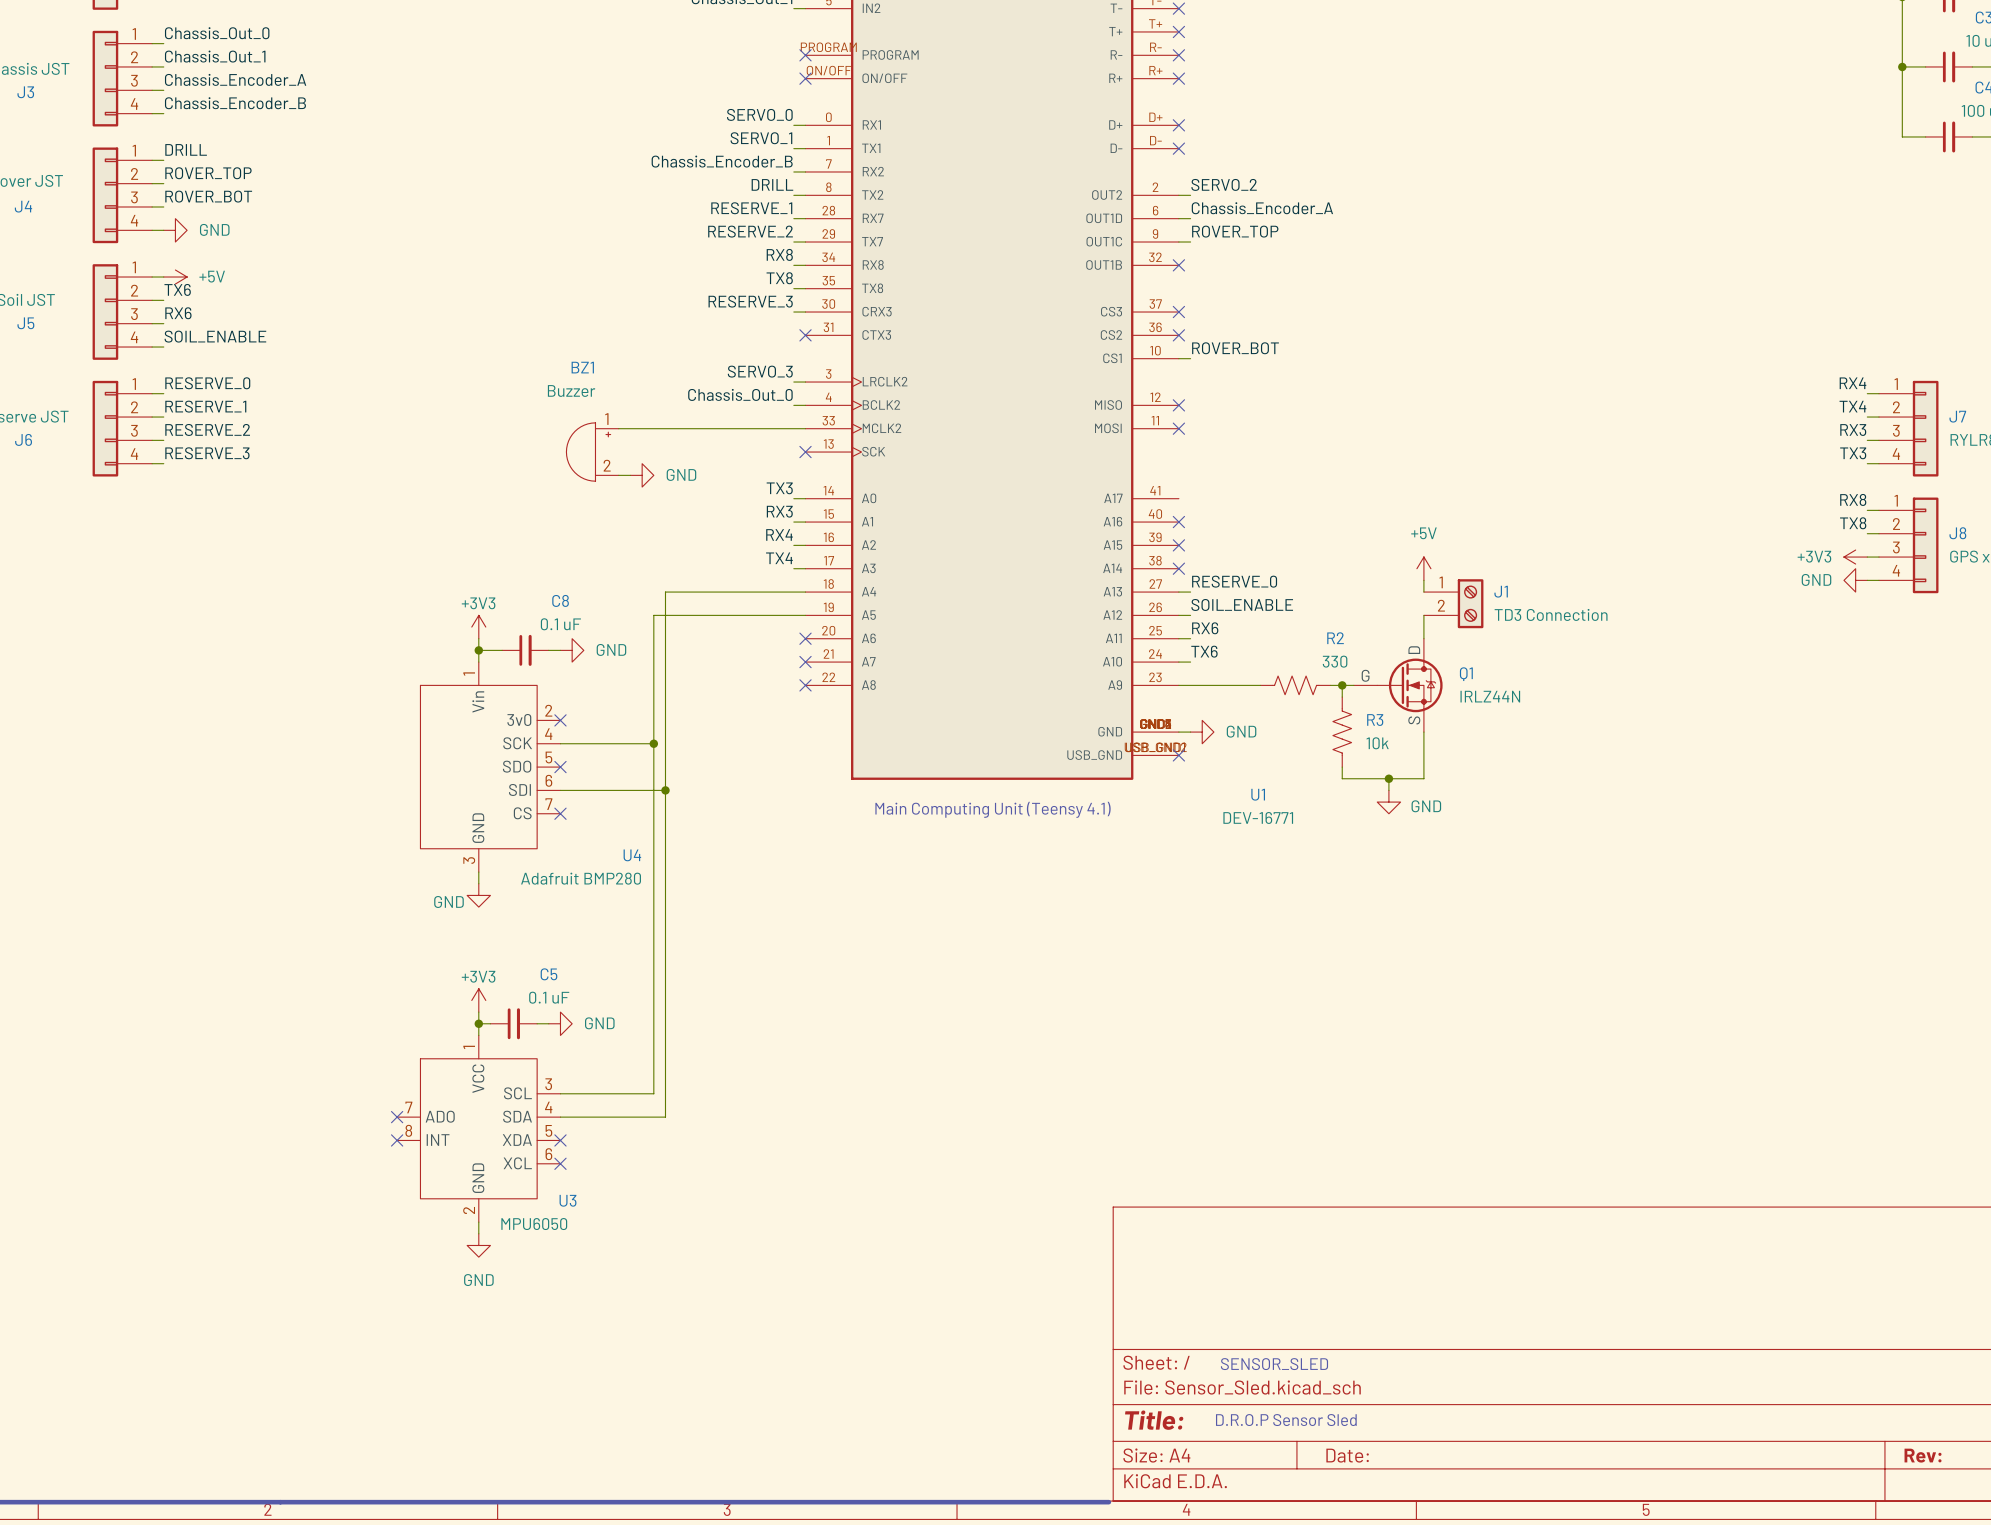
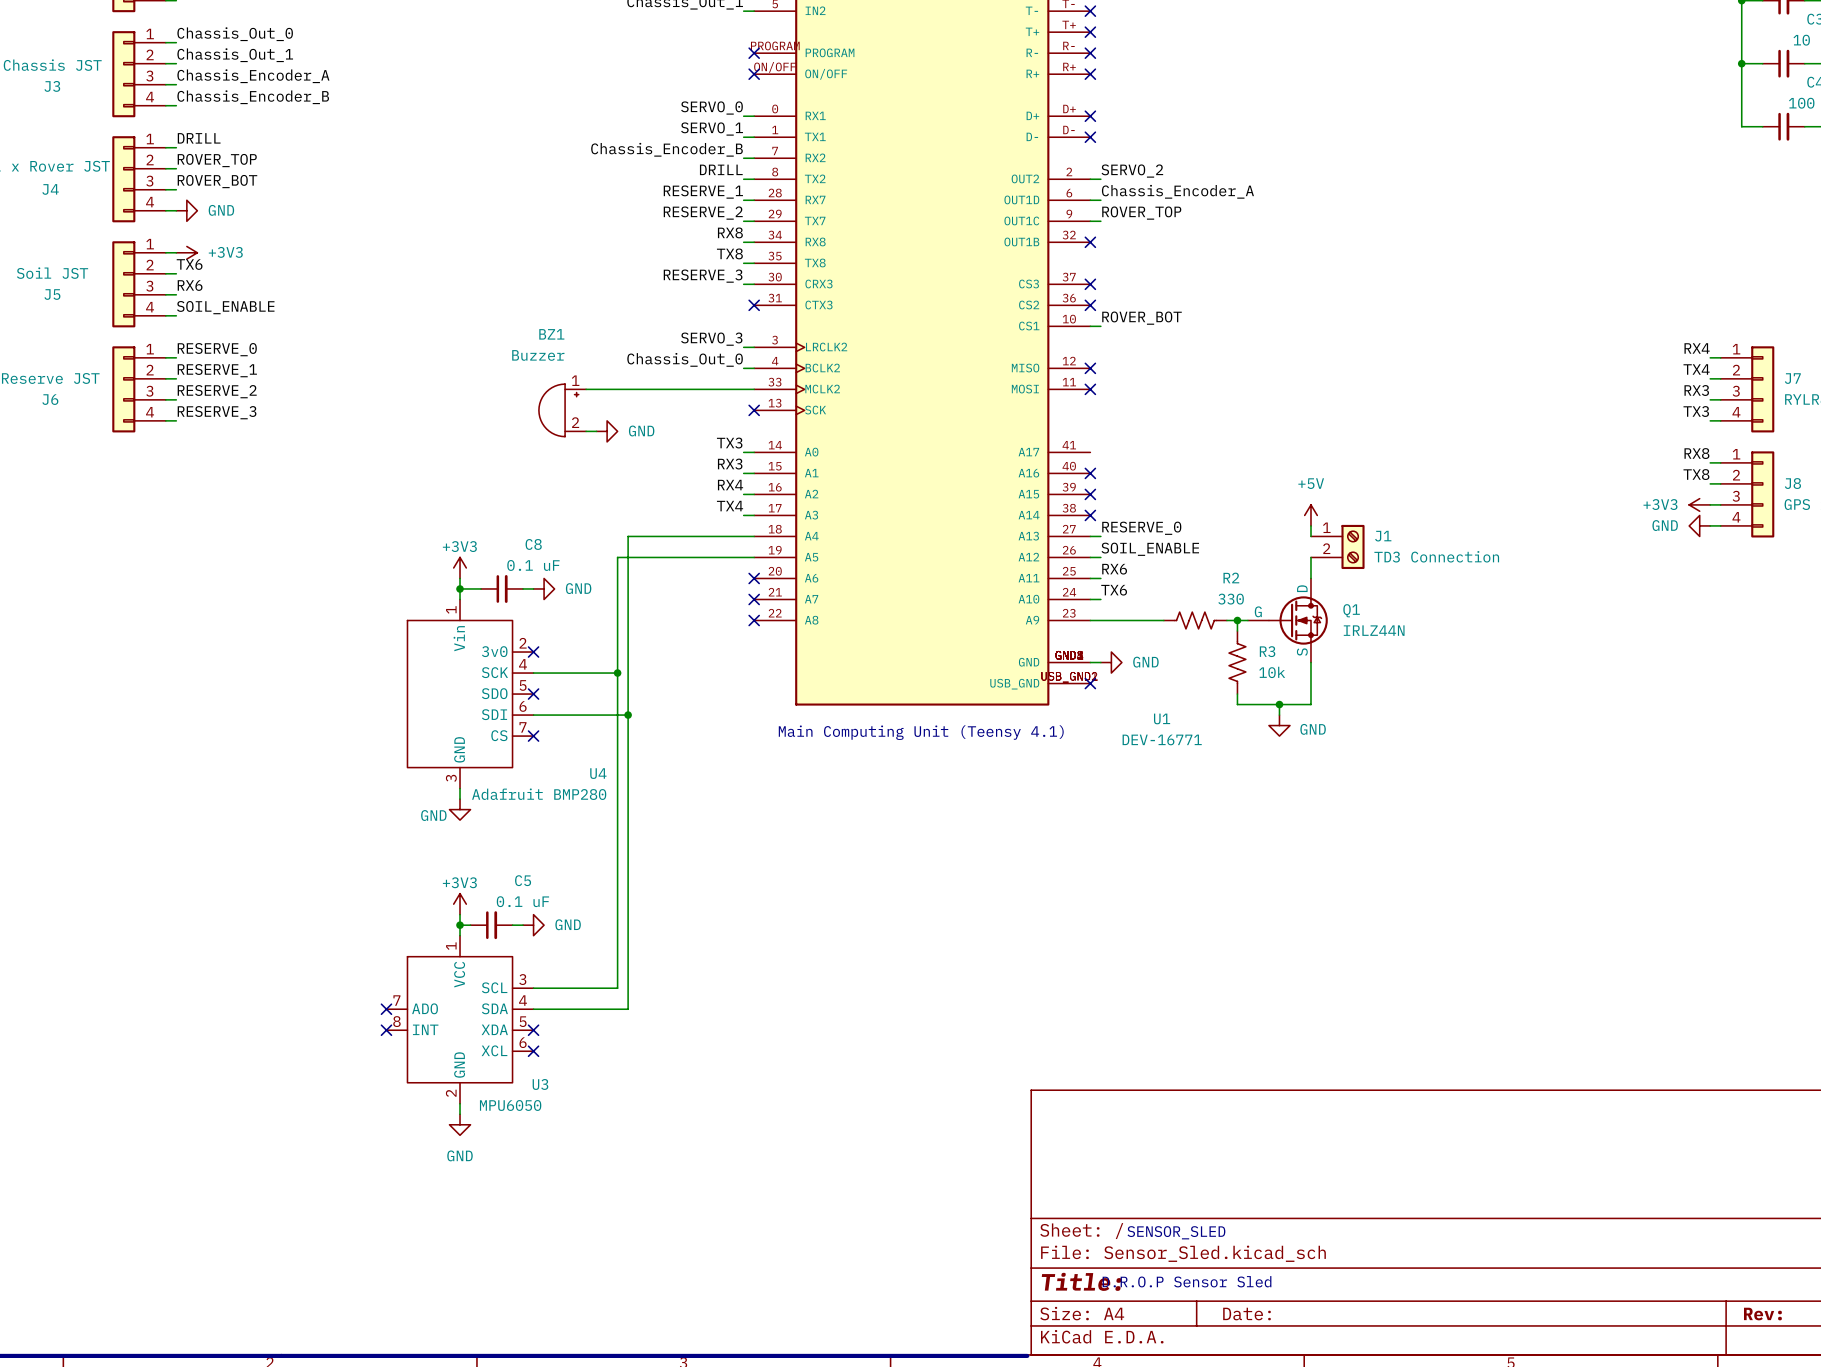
power symbol: +5V (175, 277) -> +3V3 (186, 252)

